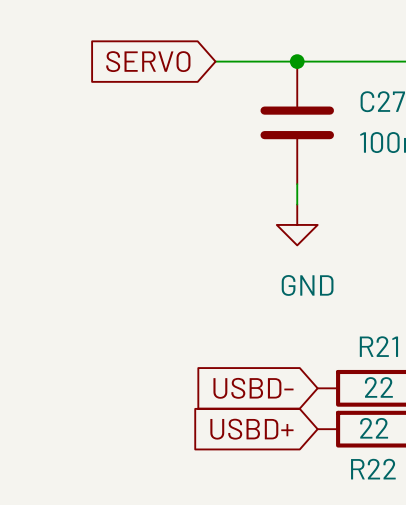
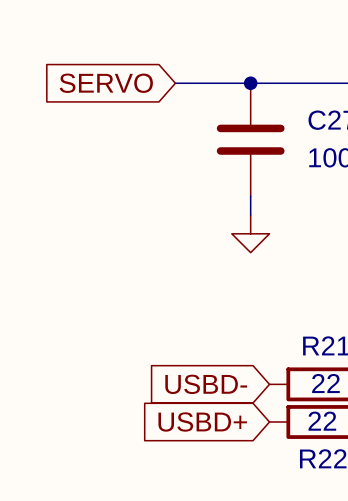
power symbol text: GND (307, 285) -> none

